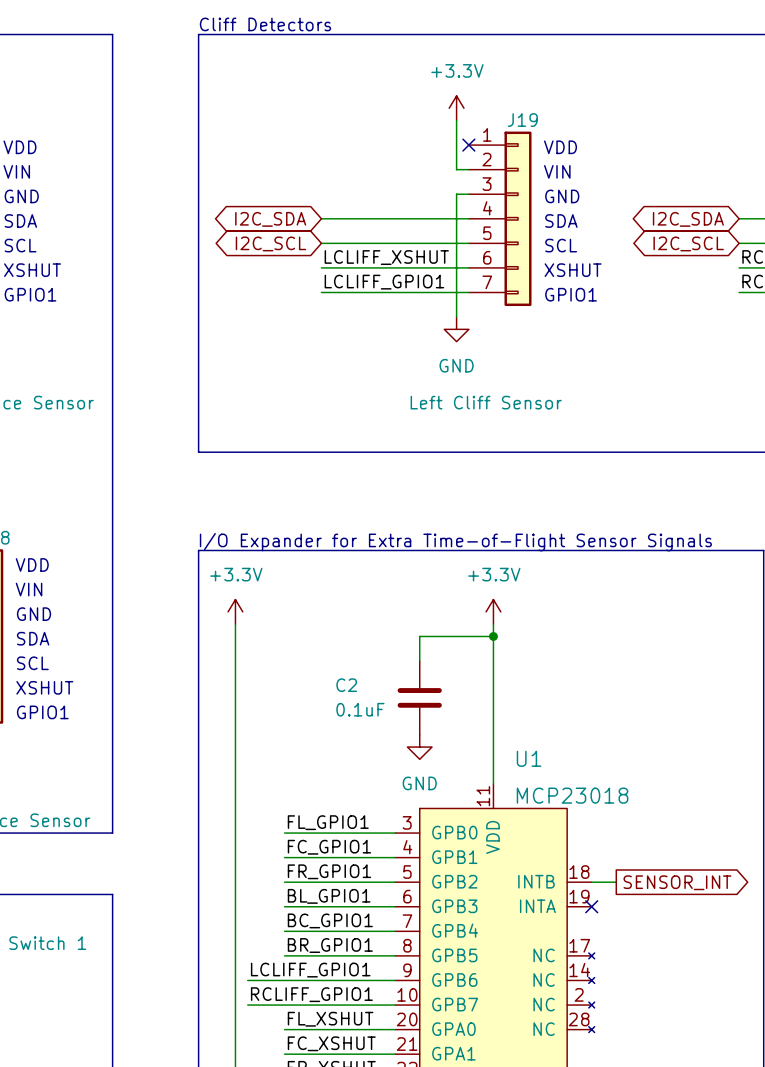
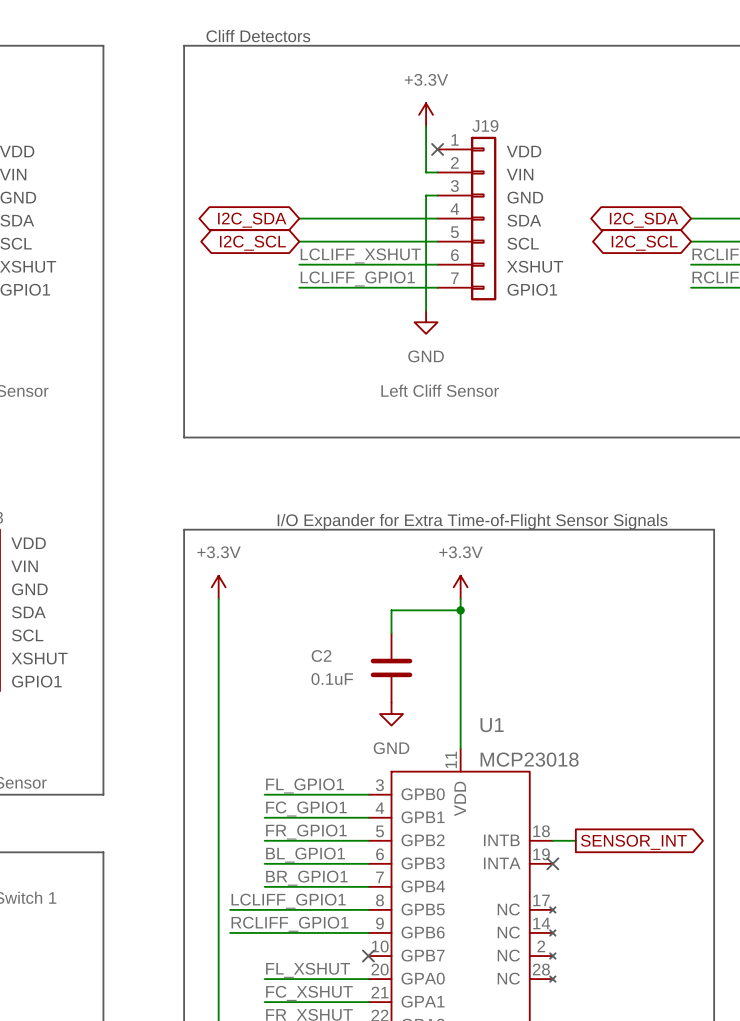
label: BC_GPIO1 (330, 920) -> BR_GPIO1 (306, 878)
label: none -> LCLIFF_GPIO1 (288, 901)
label: BR_GPIO1 (330, 945) -> none
wire: none -> (230, 909) (264, 909)
label: LCLIFF_GPIO1 (310, 970) -> RCLIFF_GPIO1 (290, 924)
label: RCLIFF_GPIO1 (311, 994) -> none
wire: (247, 1005) (395, 1005) -> none
no-connect mark: none -> (368, 956)

